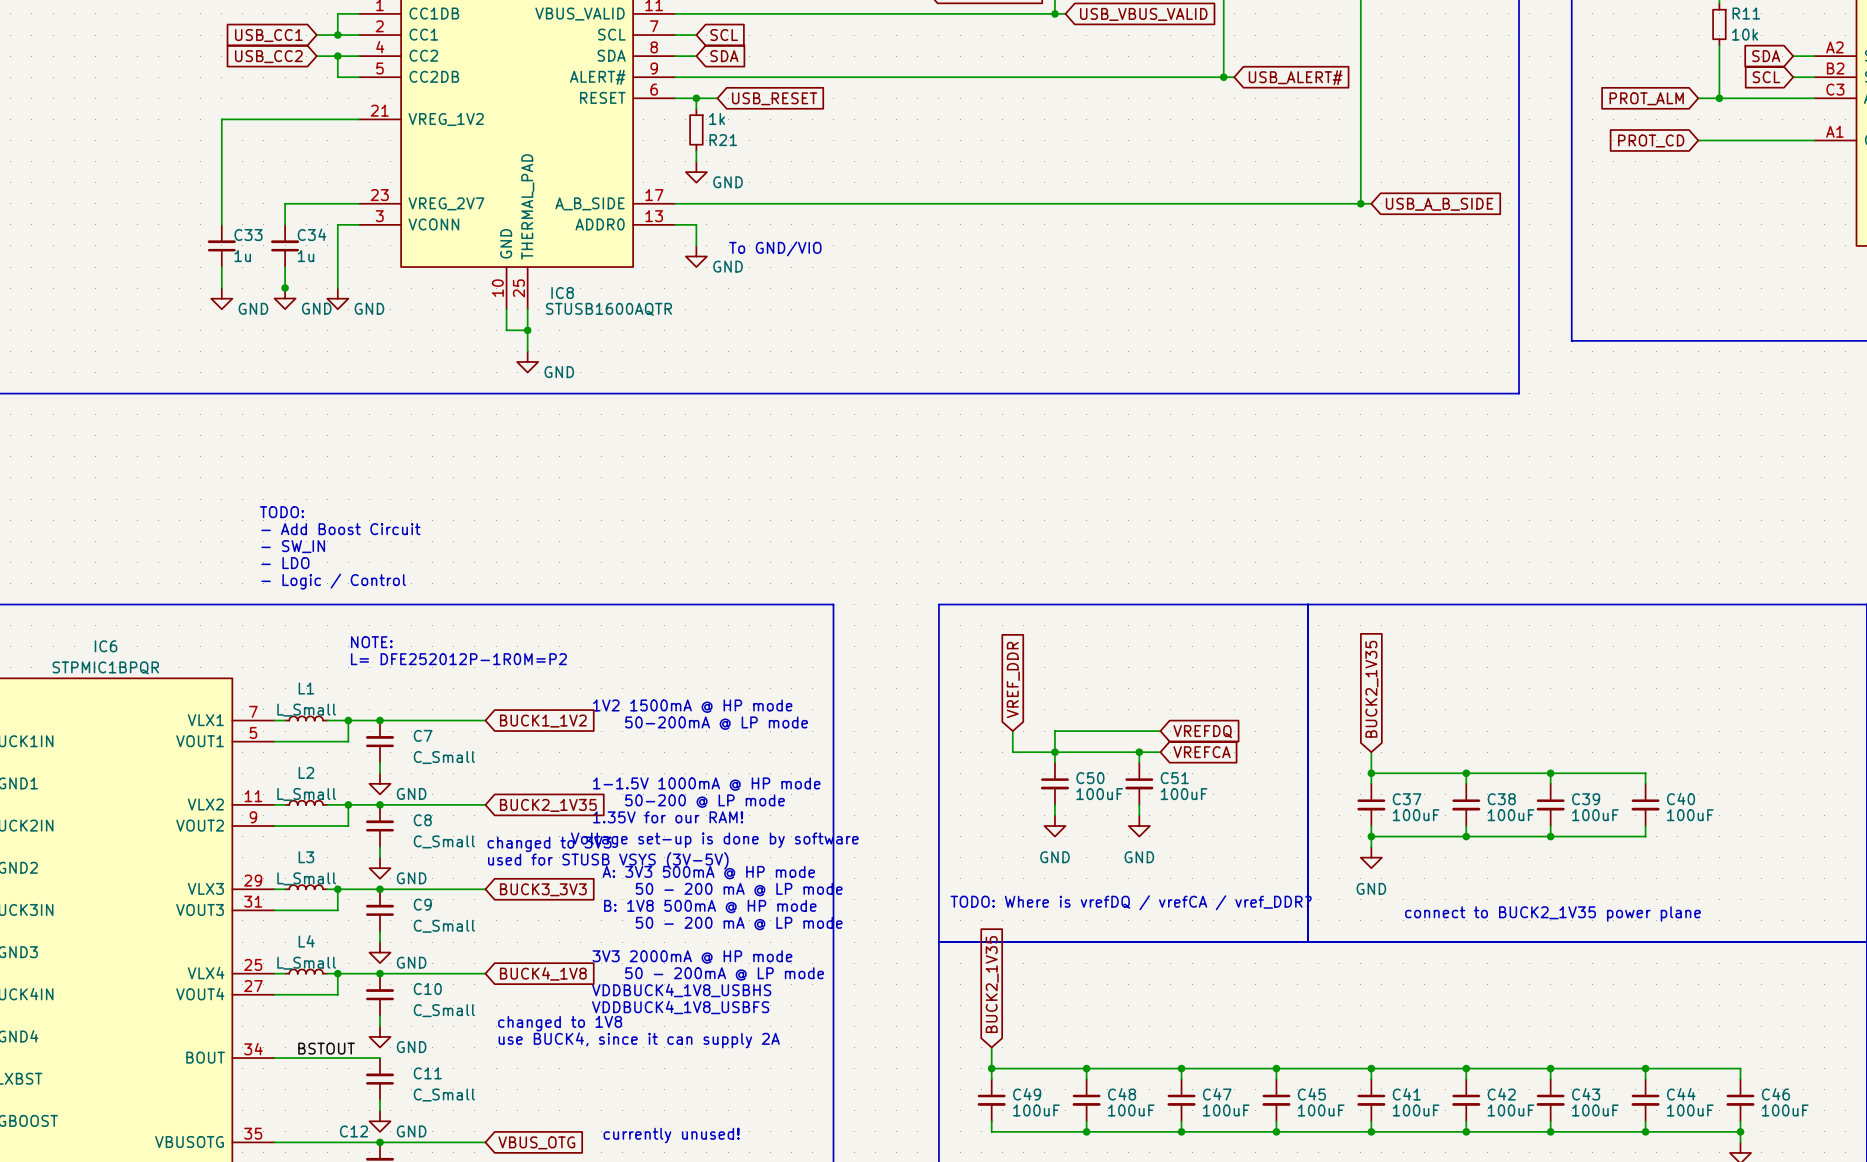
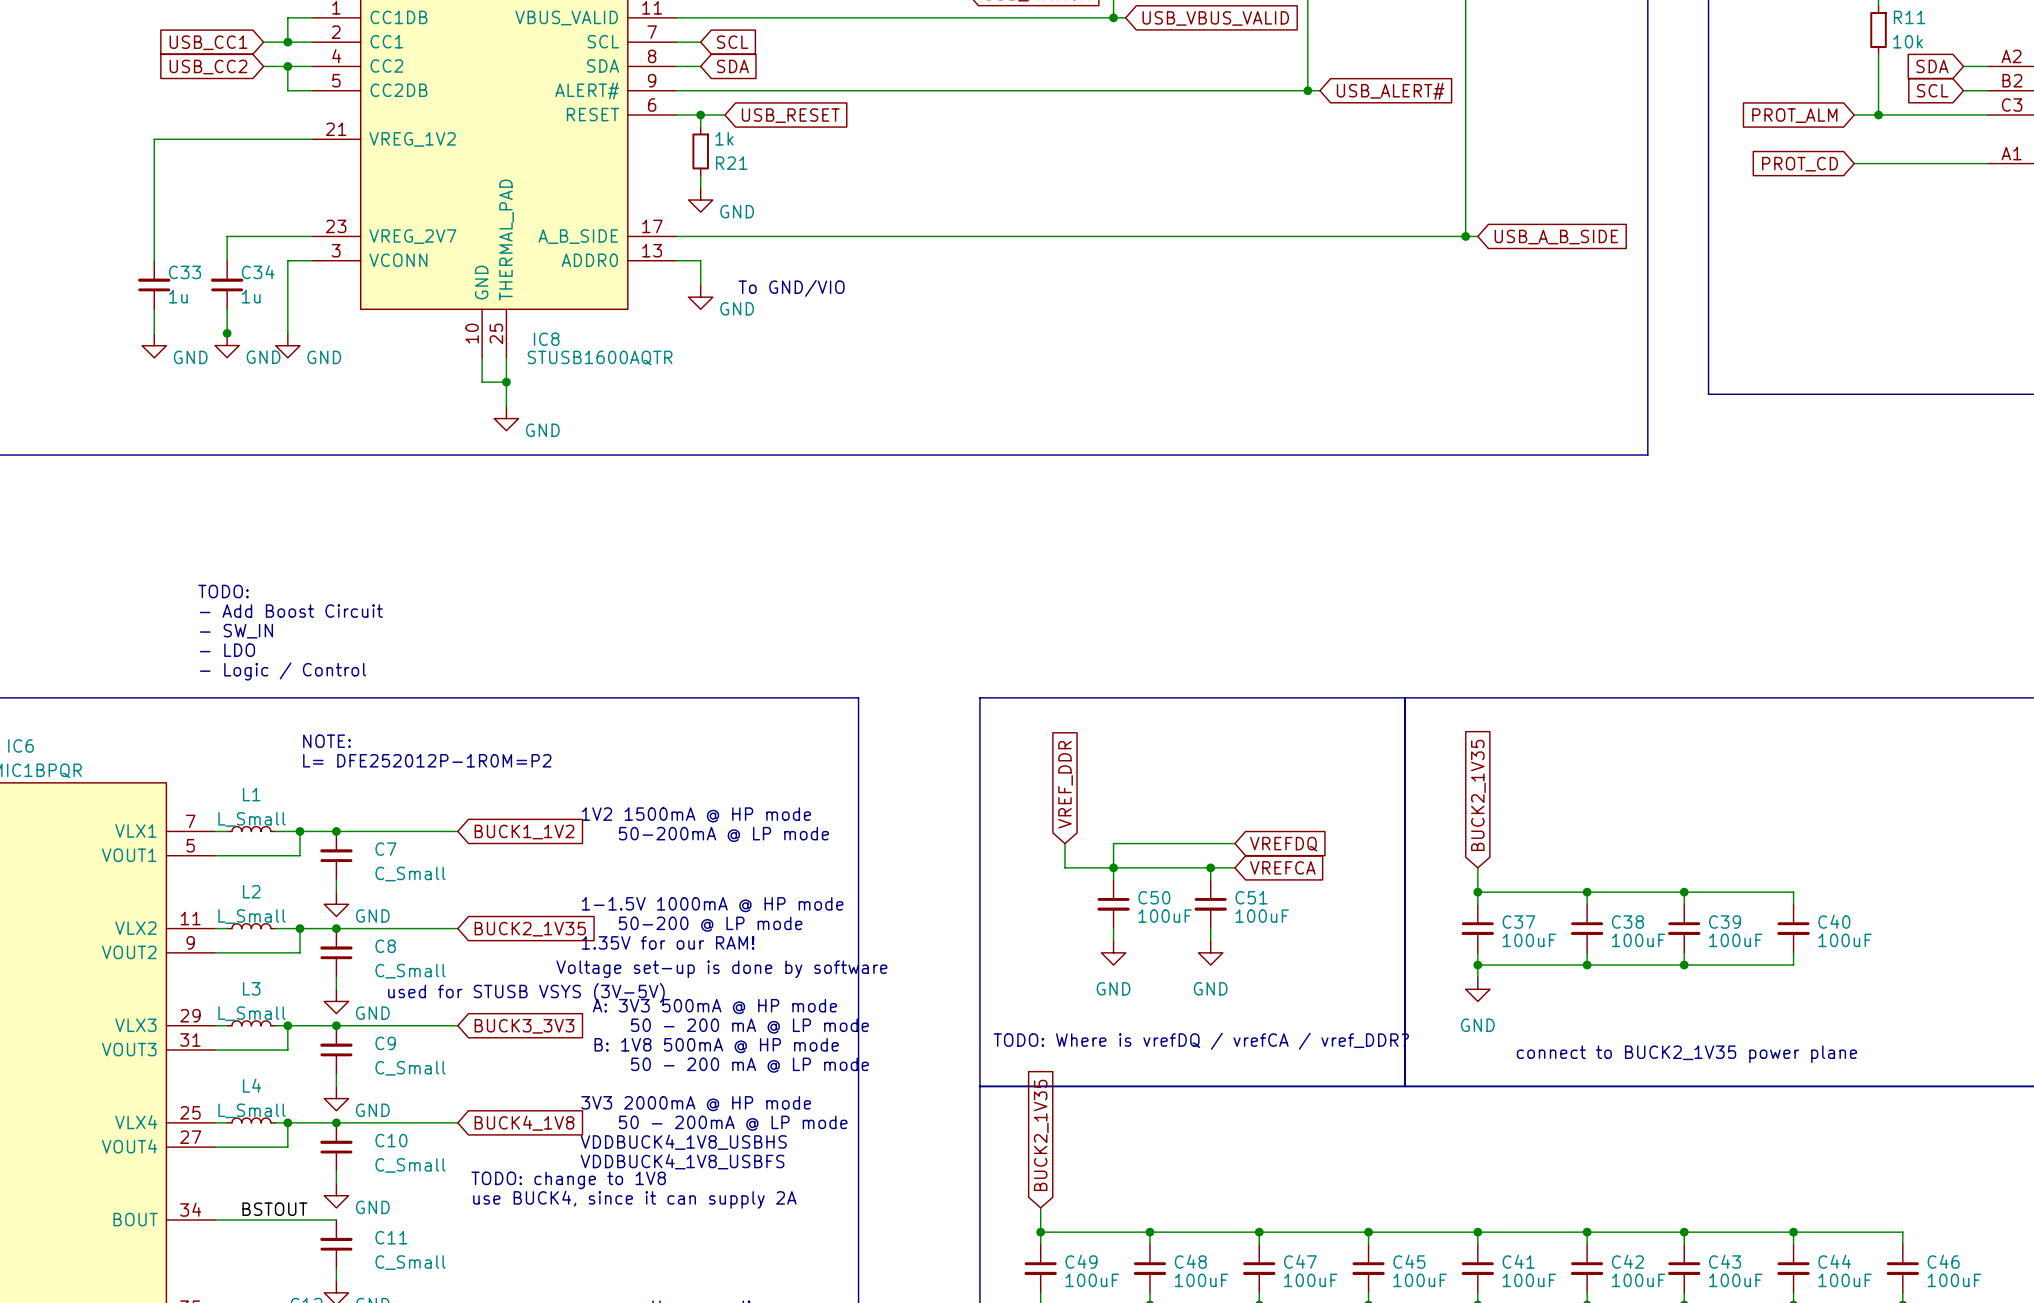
text: changed to 3V3 (549, 844) -> none
text position: used for STUSB VSYS (3V-5V) (608, 860) -> used for STUSB VSYS (3V-5V) (526, 992)
text: changed to 1V8 (560, 1023) -> TODO: change to 1V8 (568, 1180)

